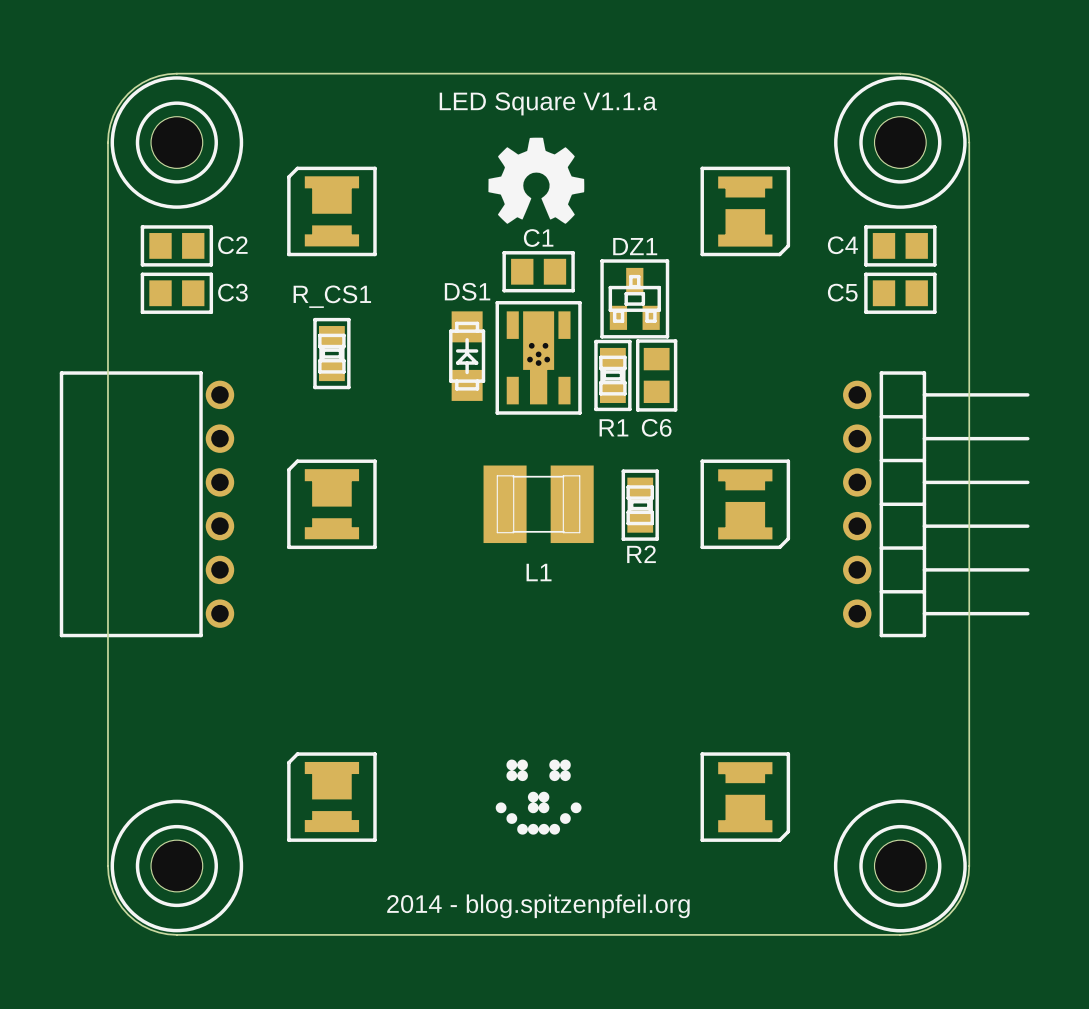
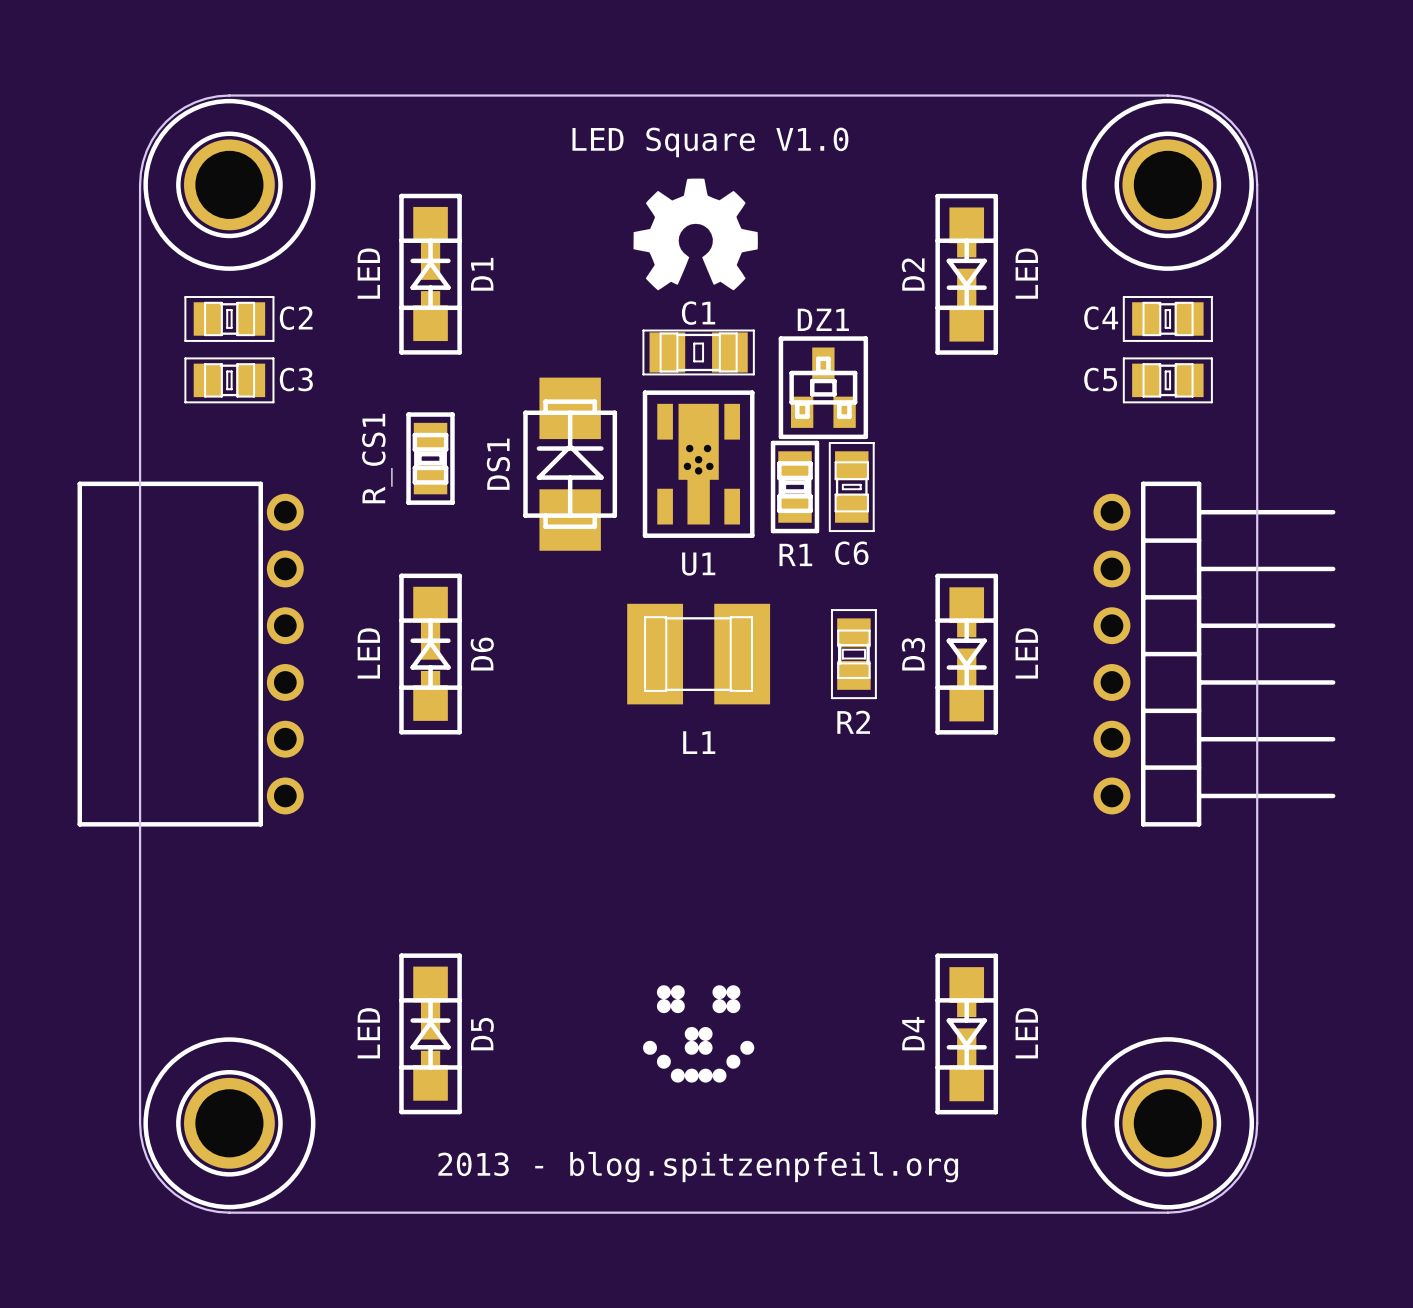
part footprint: [135, 101, 218, 184] -> [176, 131, 283, 239]
part footprint: [859, 101, 942, 184] -> [1114, 131, 1222, 239]
text: LED Square V1.1.a (548, 103) -> LED Square V1.0 (710, 142)
part: (331, 211) -> none
D1: none -> LED (430, 274)
part: (745, 211) -> none
D2: none -> LED (966, 274)
C2 footprint: [140, 225, 214, 267] -> [184, 296, 275, 342]
C4 footprint: [864, 225, 937, 267] -> [1123, 296, 1213, 342]
C1 footprint: [502, 251, 575, 293] -> [642, 329, 755, 376]
C3 footprint: [140, 272, 214, 314] -> [184, 357, 275, 403]
C5 footprint: [864, 272, 937, 314] -> [1123, 357, 1213, 403]
DS1 name position: DS1 (467, 291) -> DS1 (498, 464)
R_CS1 name rotation: 0° (332, 296) -> 90° counterclockwise (377, 458)
DS1 footprint: [449, 311, 486, 401] -> [523, 377, 618, 551]
C6 footprint: [635, 339, 678, 412] -> [829, 442, 875, 532]
U1 name: none -> U1 (698, 564)
R2 footprint: [621, 469, 659, 541] -> [831, 609, 877, 699]
part: (331, 504) -> none
D6: none -> LED (430, 654)
part: (745, 504) -> none
D3: none -> LED (966, 654)
part: (331, 797) -> none
D5: none -> LED (430, 1033)
part: (745, 797) -> none
D4: none -> LED (966, 1033)
part footprint: [135, 824, 218, 908] -> [176, 1070, 283, 1177]
part footprint: [859, 824, 942, 908] -> [1114, 1070, 1222, 1177]
text: 2014 - blog.spitzenpfeil.org (538, 906) -> 2013 - blog.spitzenpfeil.org (698, 1167)

